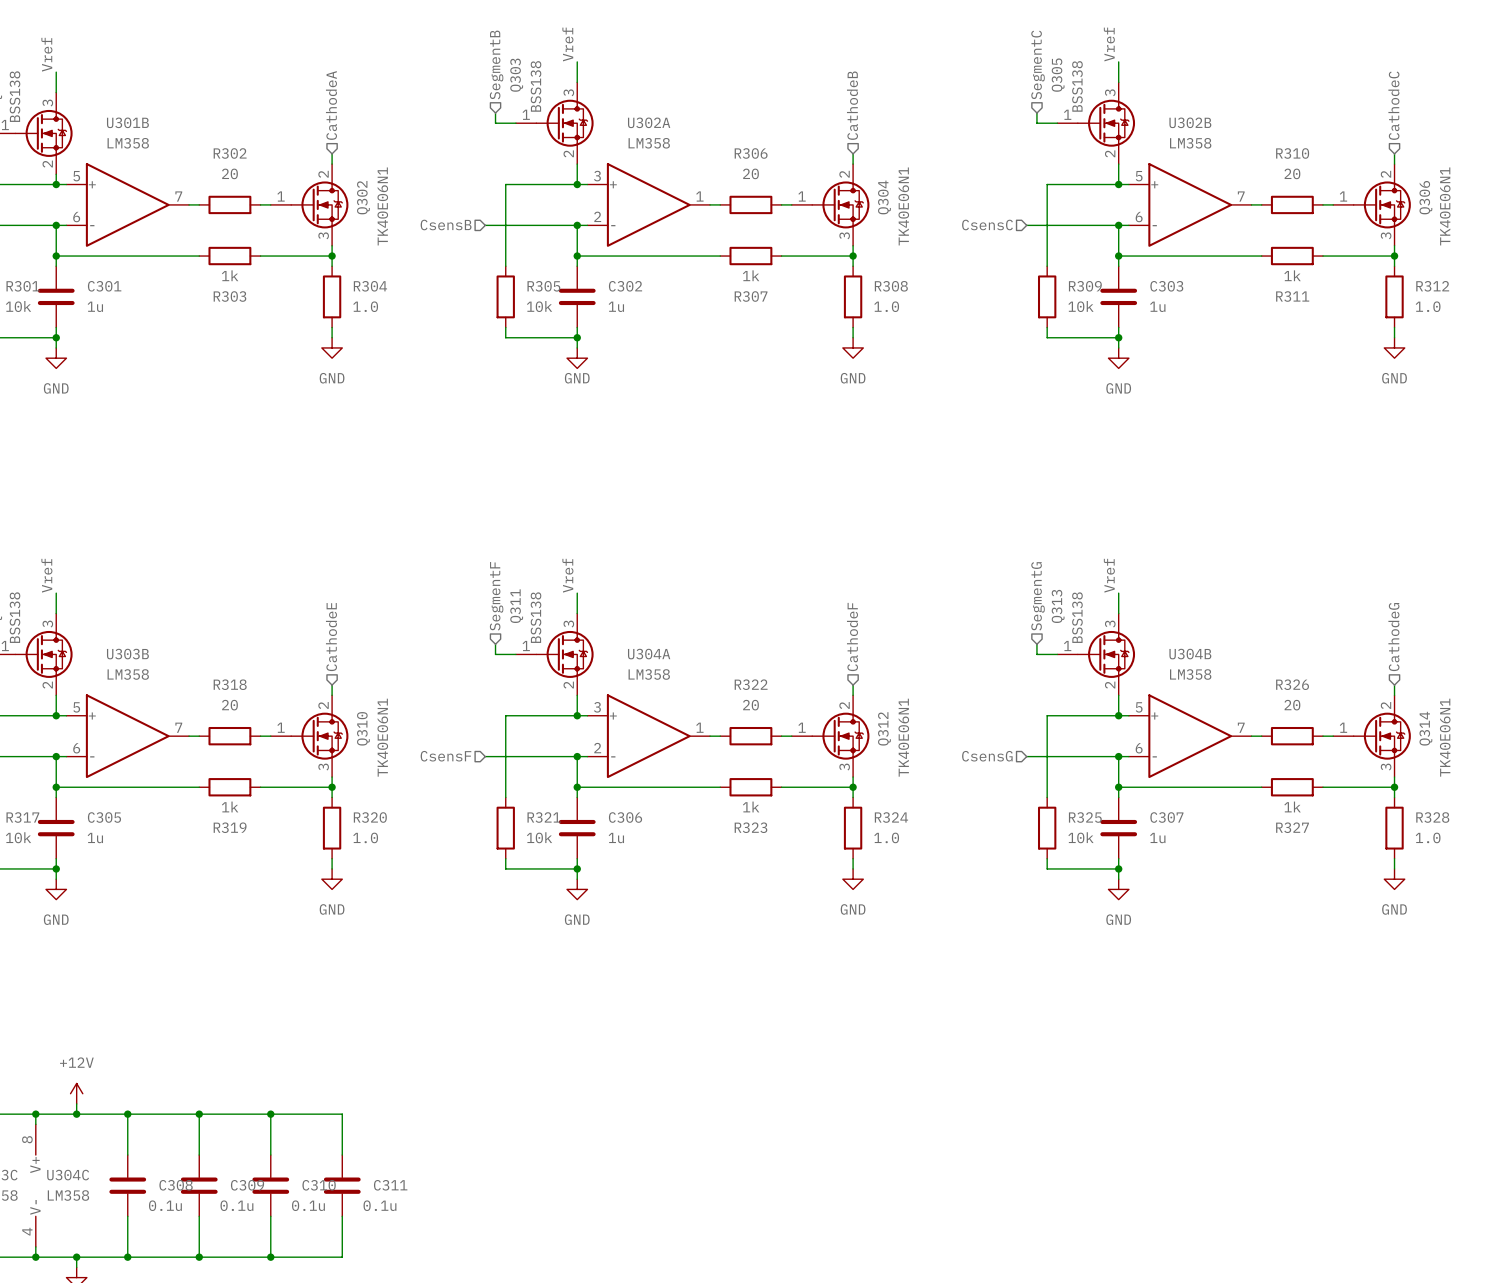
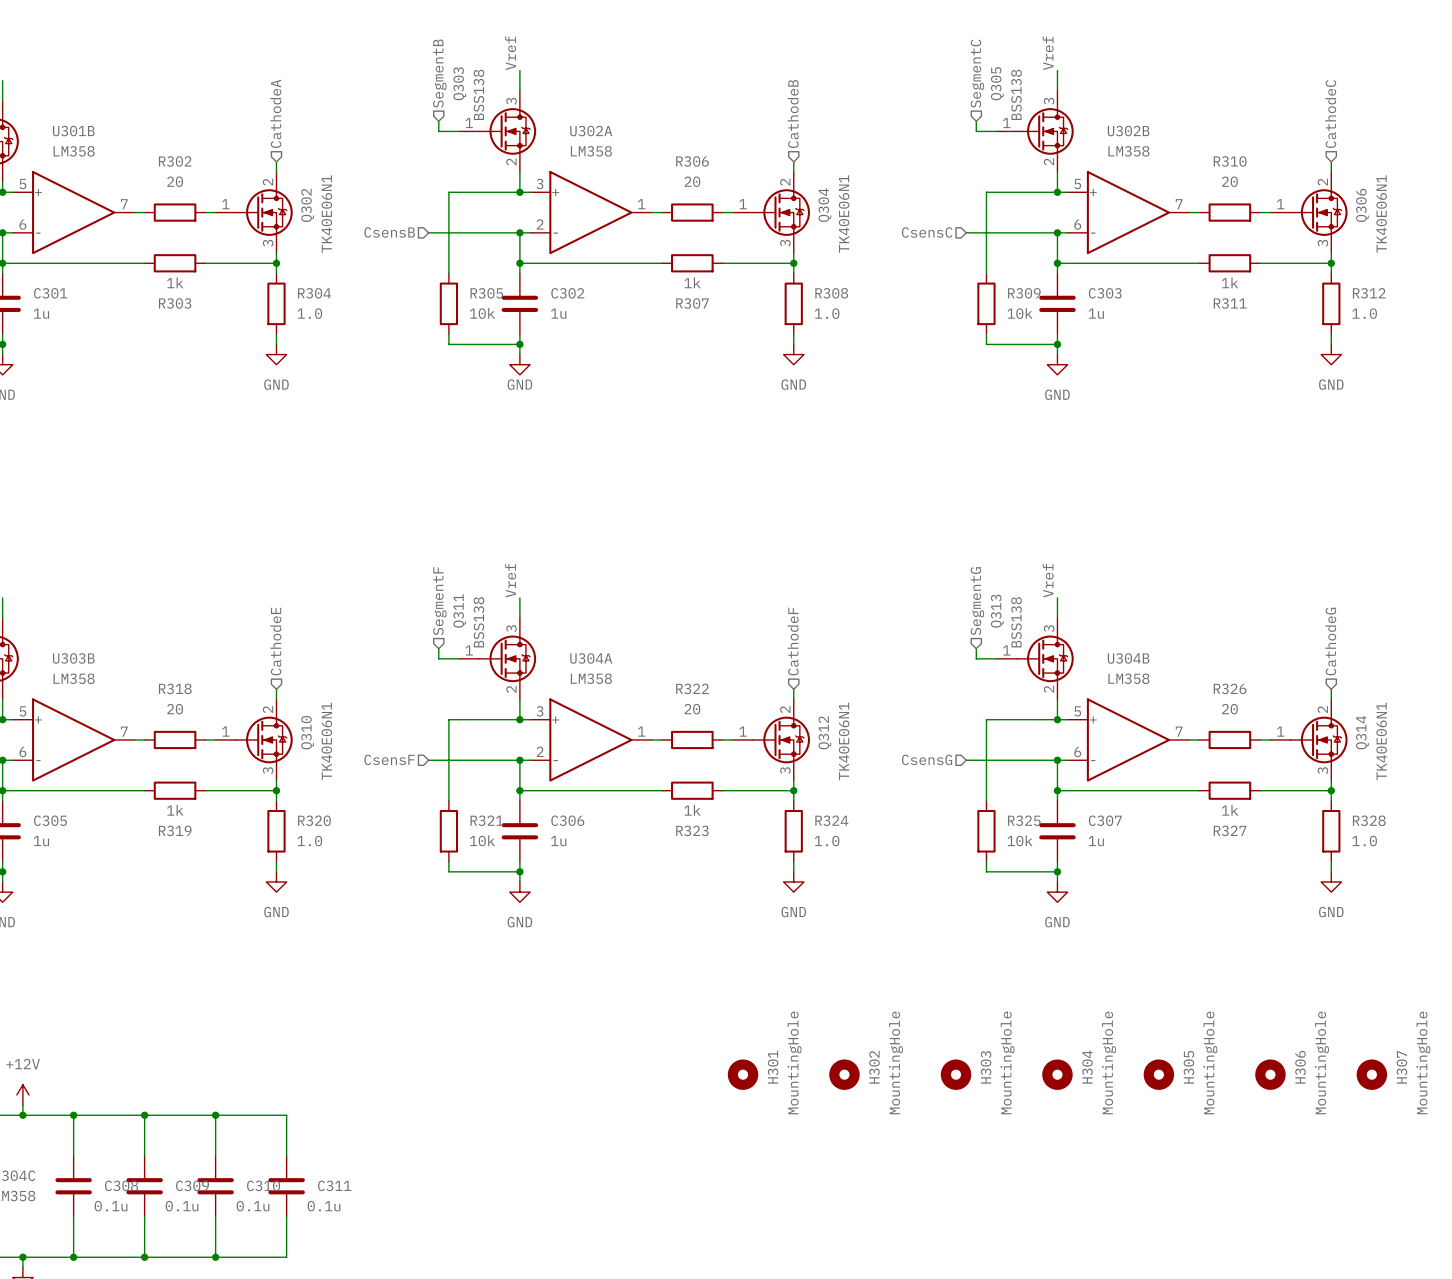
H301: none -> MountingHole (743, 1074)
H302: none -> MountingHole (844, 1074)
H303: none -> MountingHole (956, 1074)
H304: none -> MountingHole (1057, 1074)
H305: none -> MountingHole (1158, 1074)
H306: none -> MountingHole (1270, 1074)
H307: none -> MountingHole (1371, 1074)

